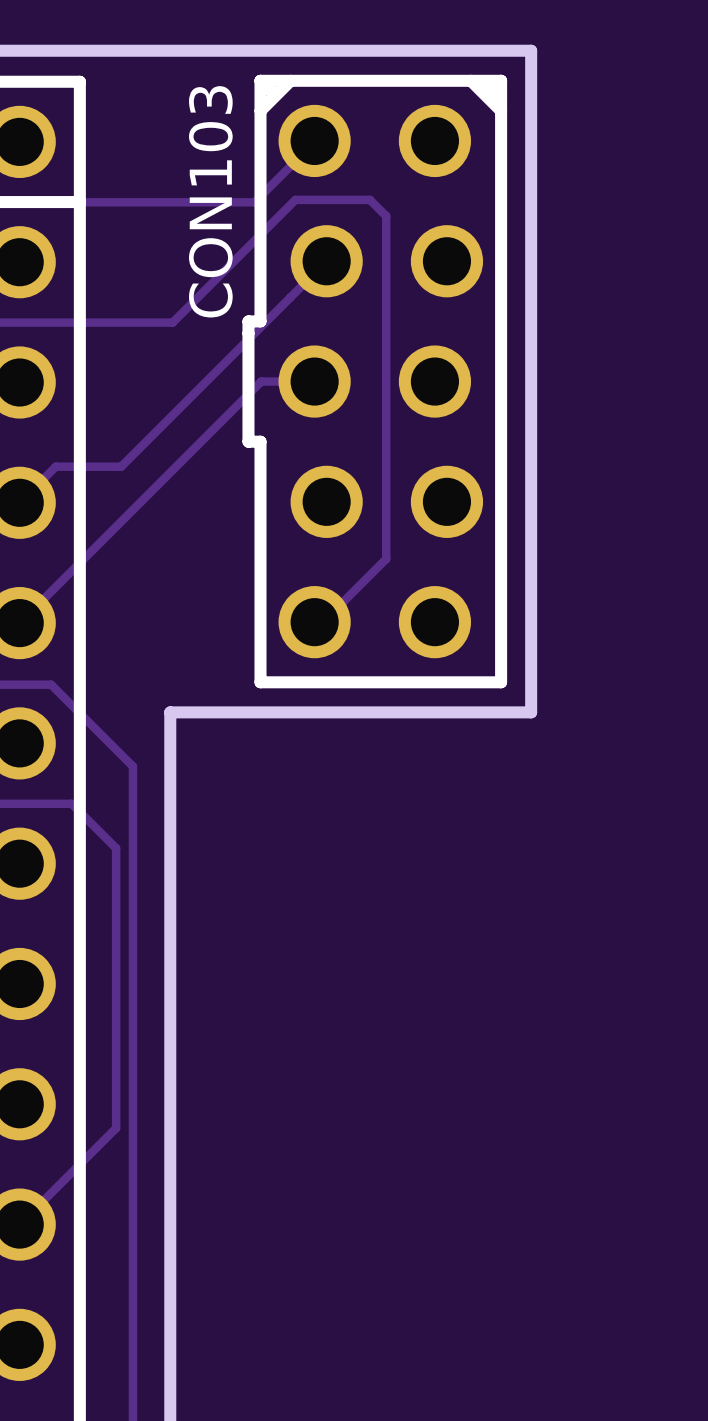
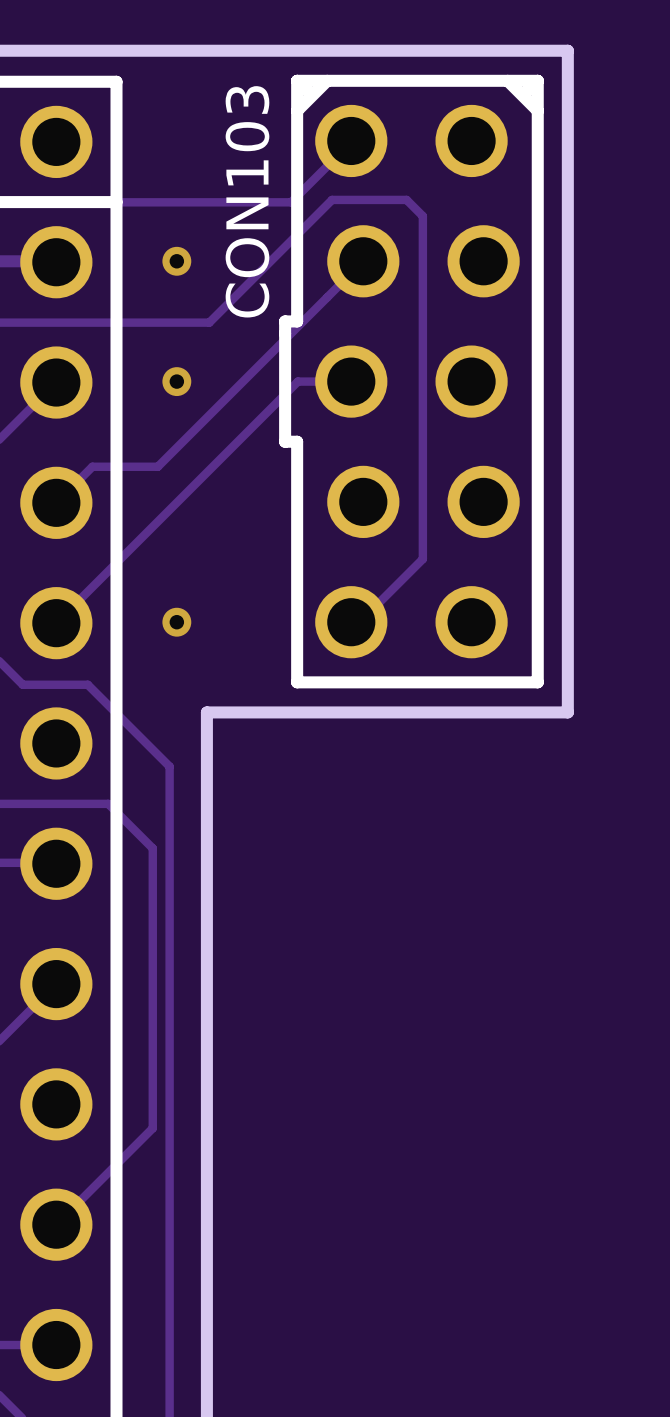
via: none -> (176, 261)
via: none -> (176, 381)
via: none -> (176, 622)

